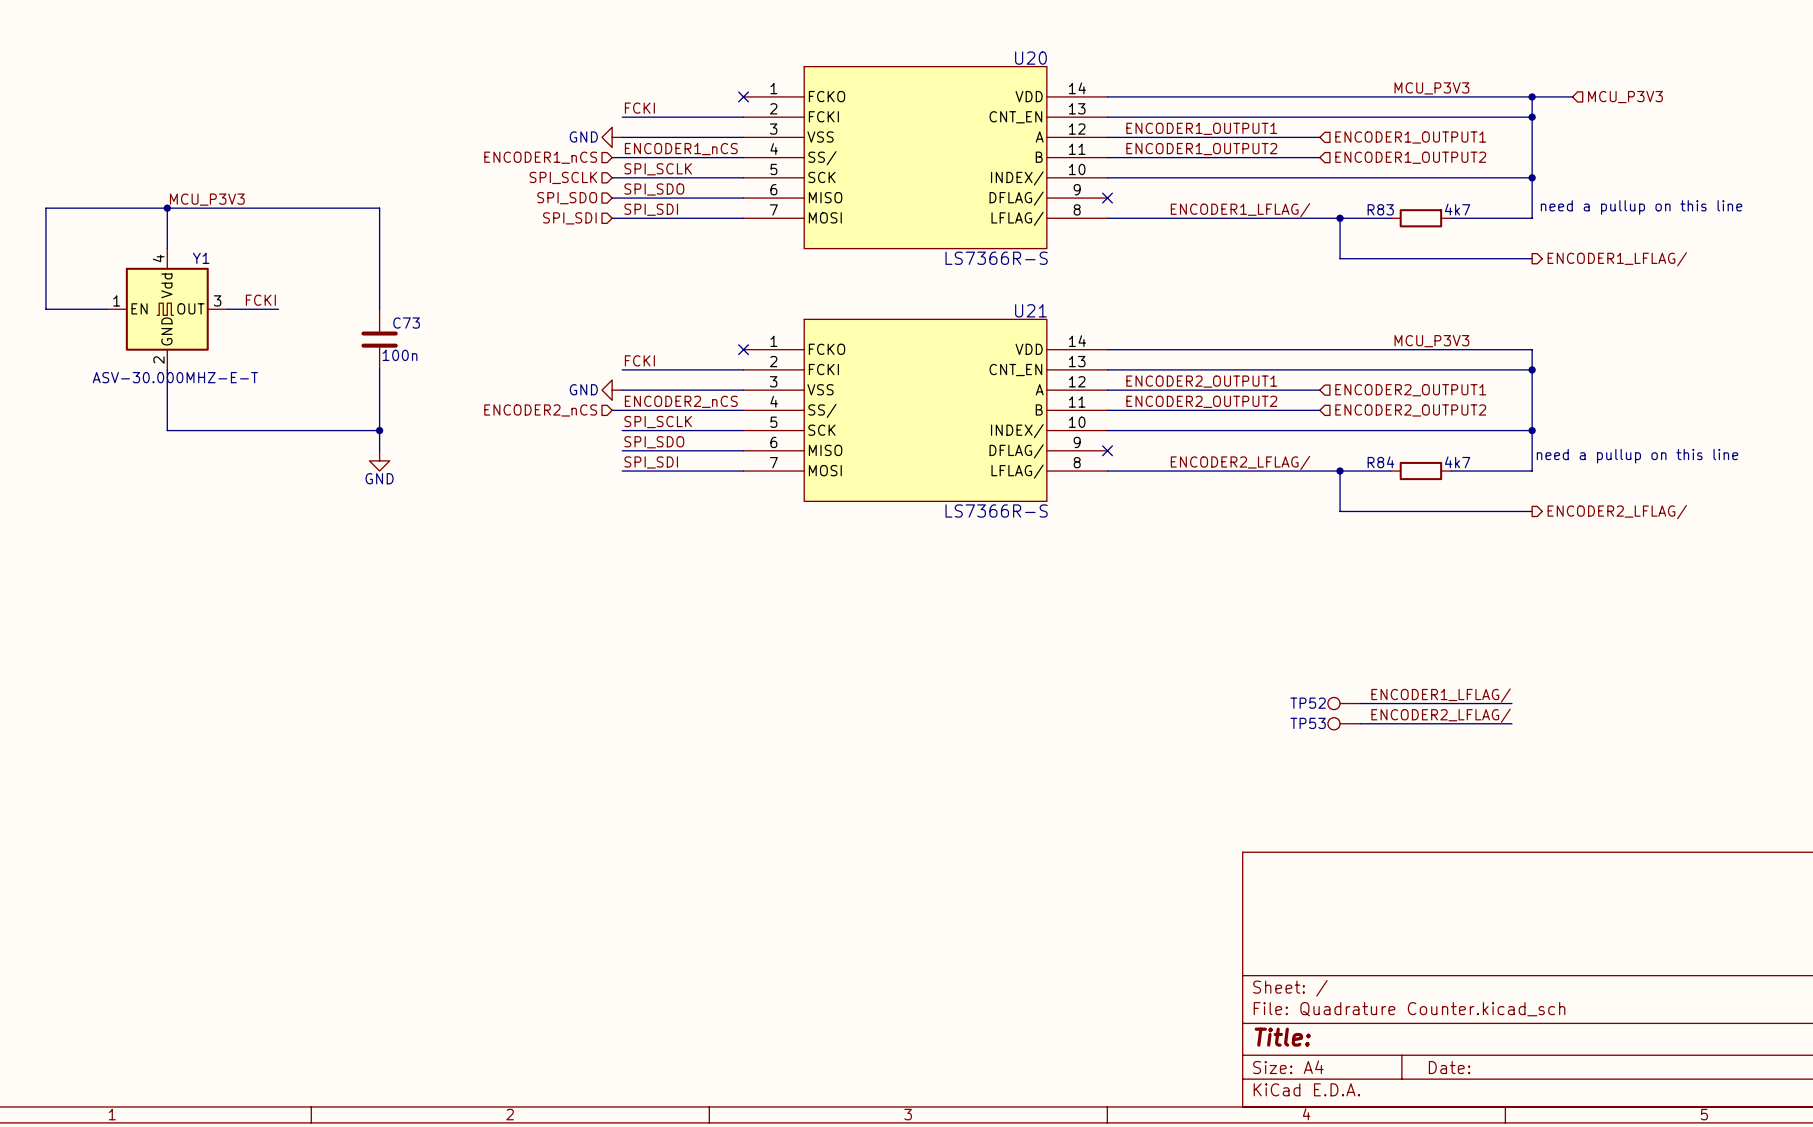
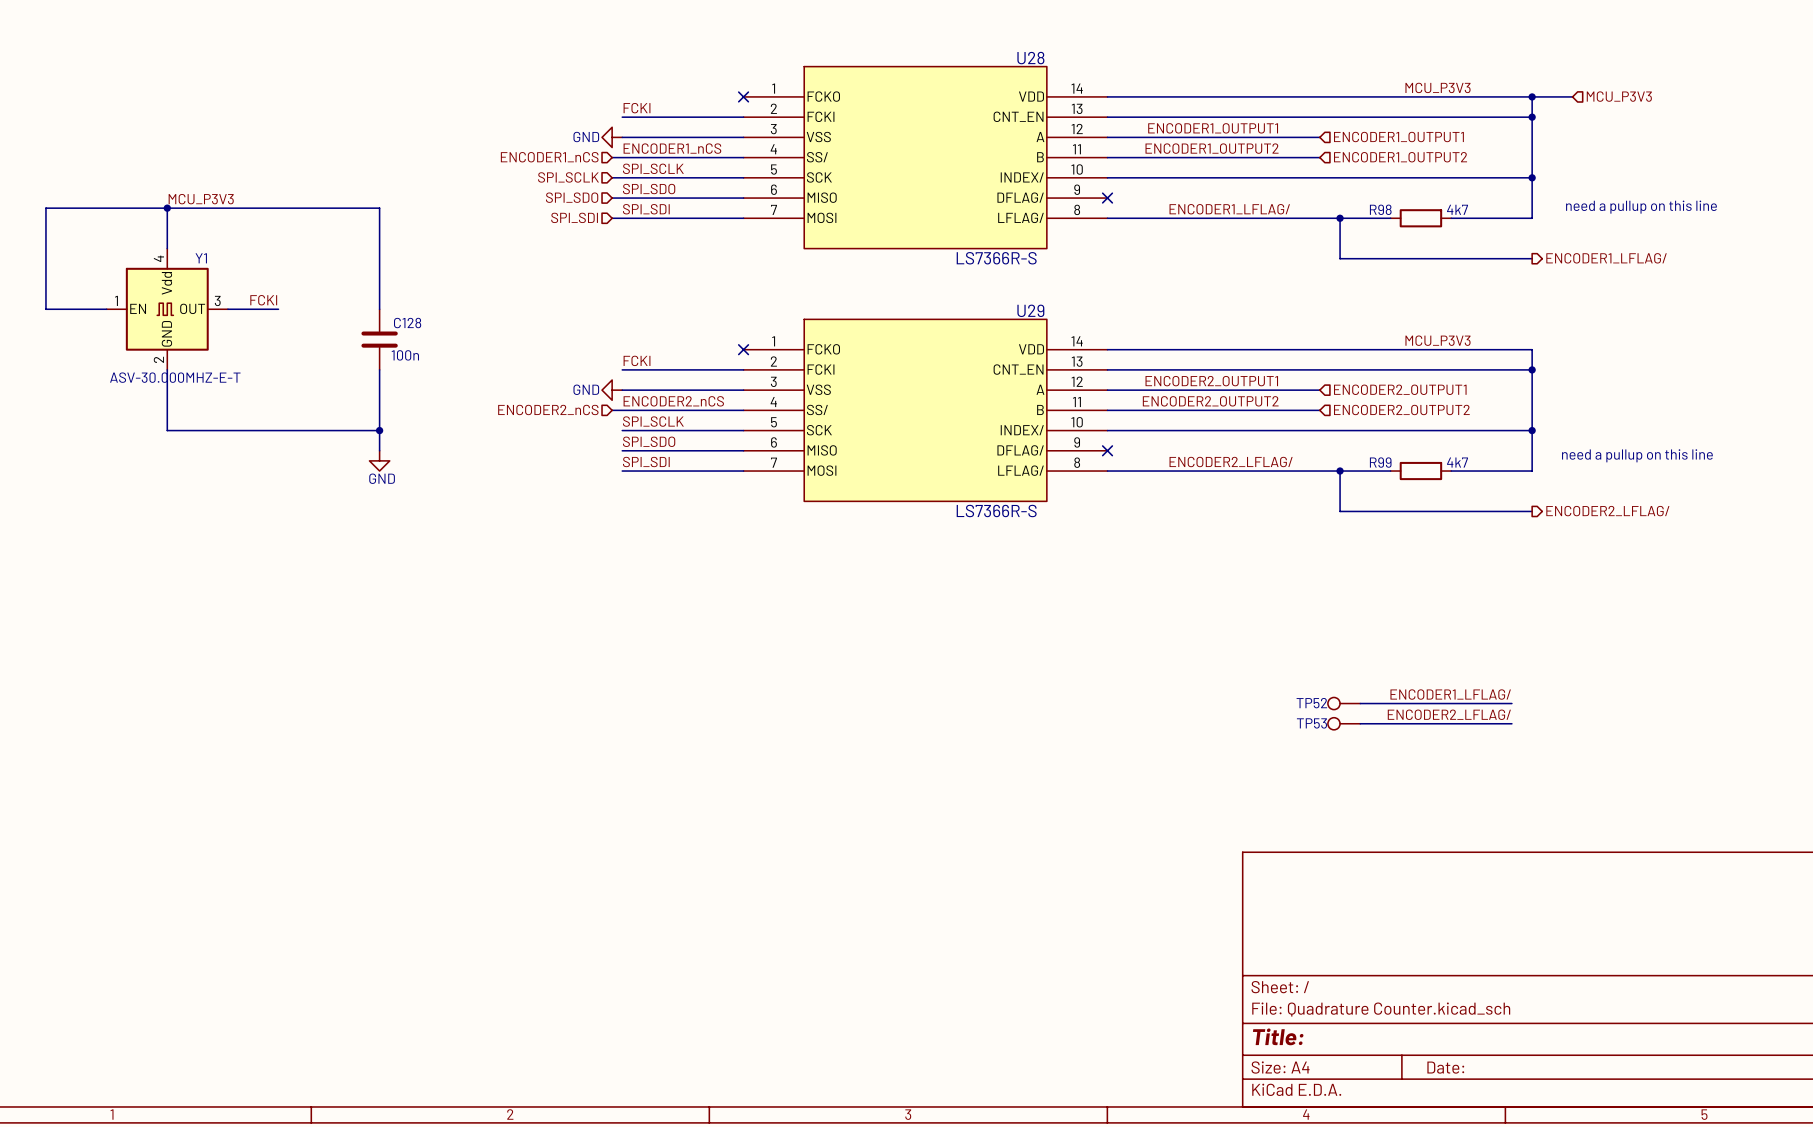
U20 name: U20 (1030, 58) -> U28 (1030, 58)
R83 name: R83 (1380, 209) -> R98 (1380, 209)
U21 name: U21 (1030, 310) -> U29 (1030, 310)
C73 name: C73 (406, 323) -> C128 (407, 323)
R84 name: R84 (1380, 462) -> R99 (1380, 462)

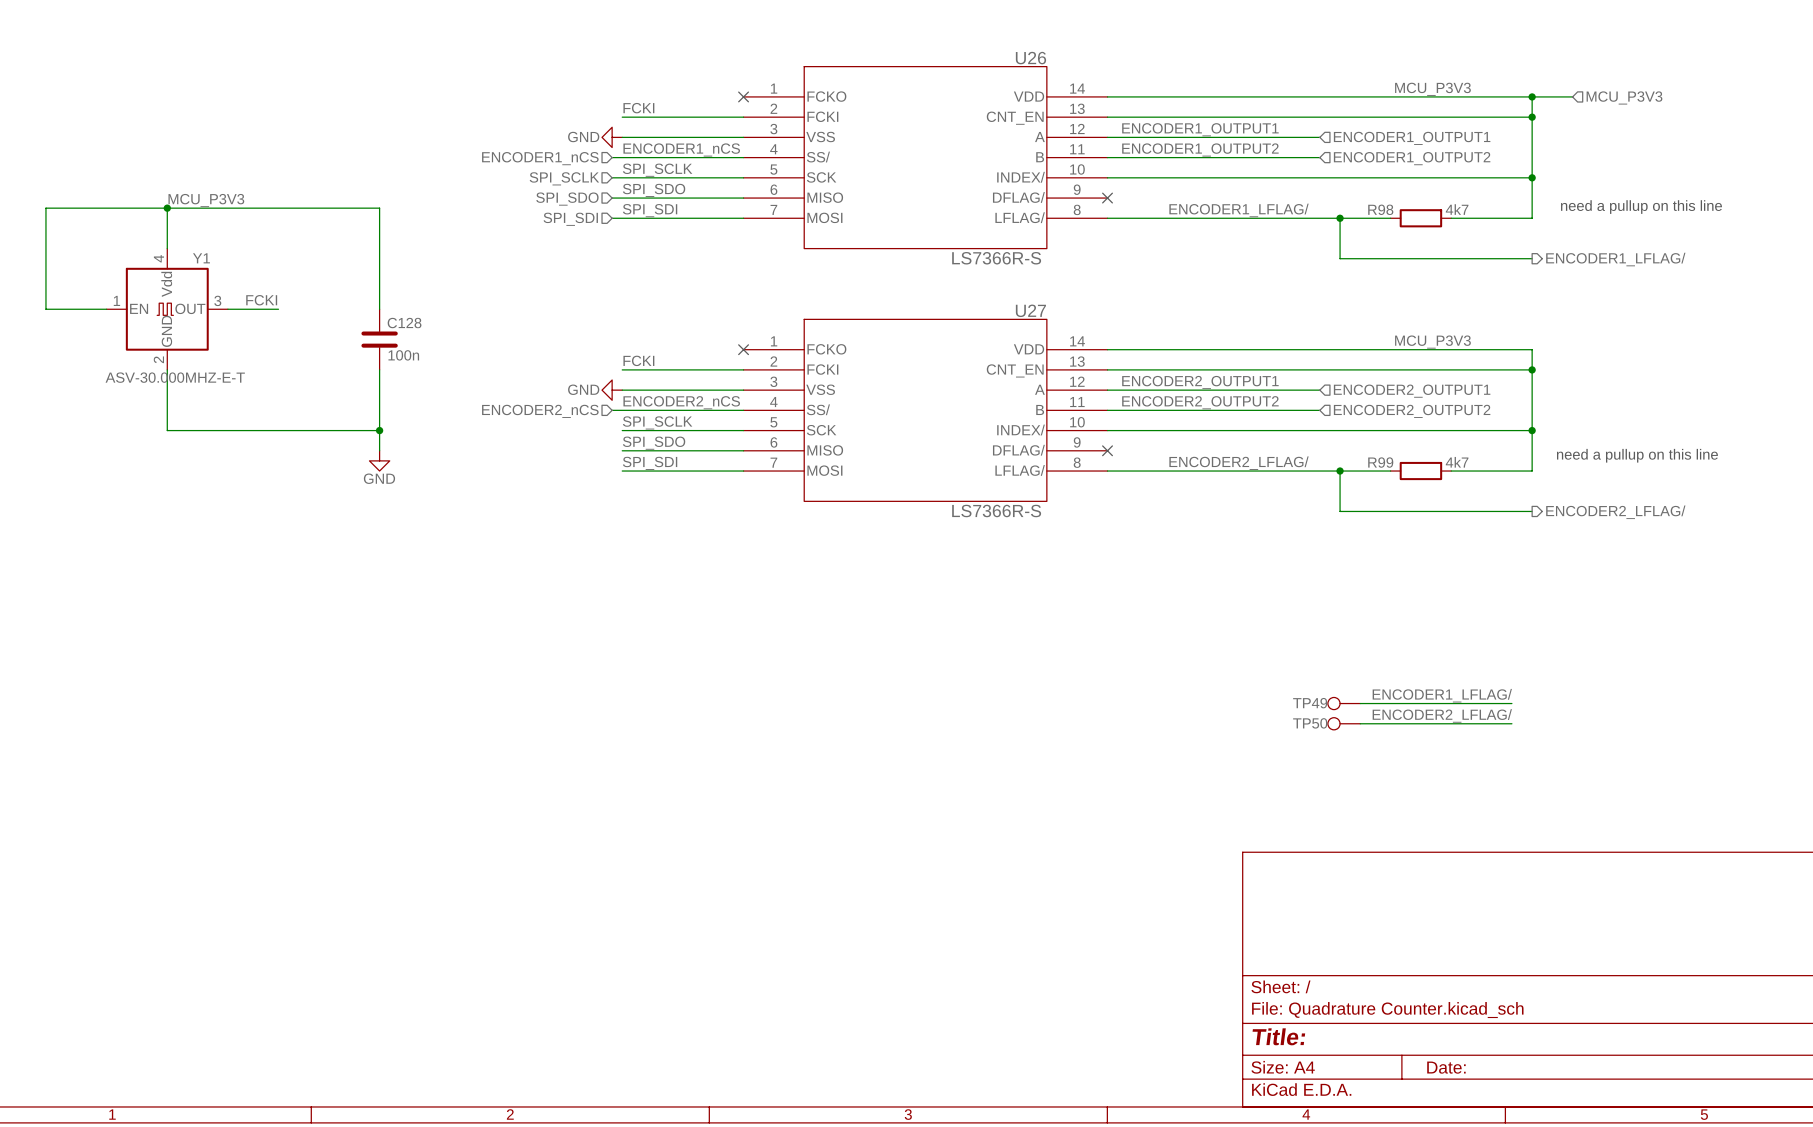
U28 name: U28 (1030, 58) -> U26 (1030, 58)
U29 name: U29 (1030, 310) -> U27 (1030, 310)
TP52 name: TP52 (1311, 703) -> TP49 (1310, 703)
TP53 name: TP53 (1311, 723) -> TP50 (1310, 723)

